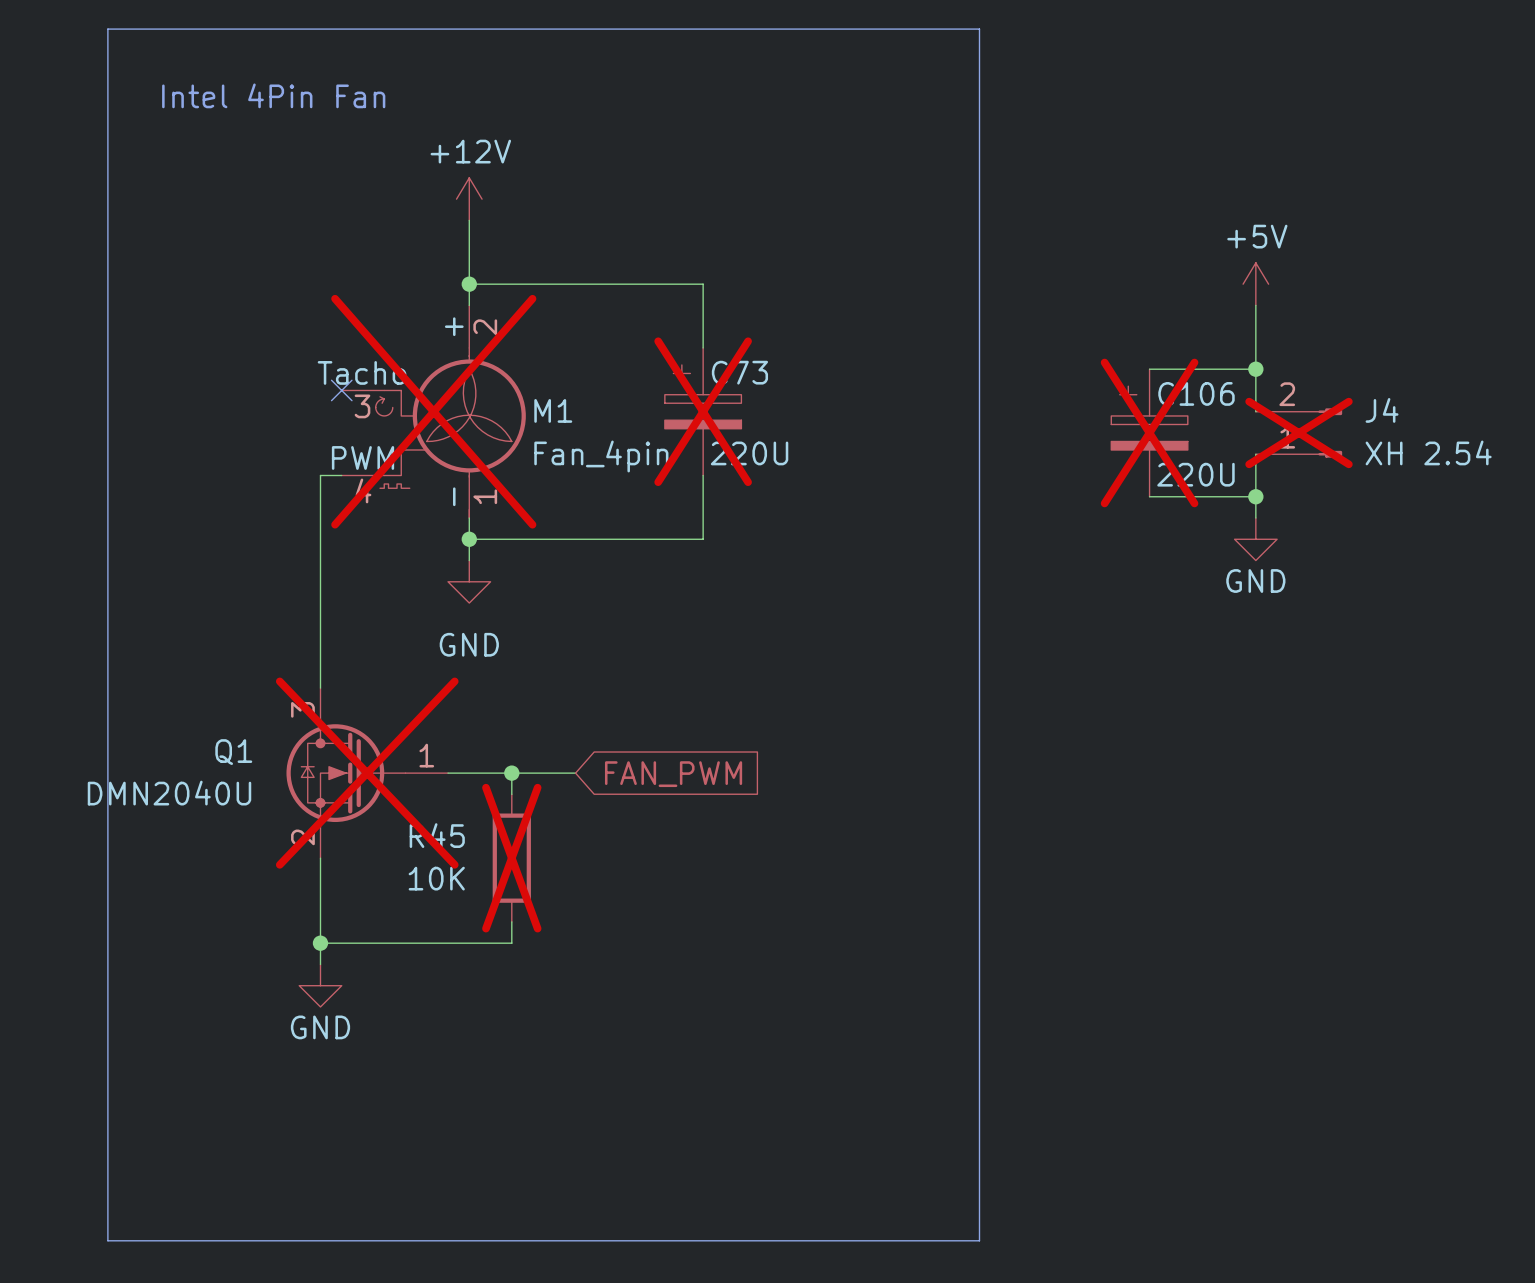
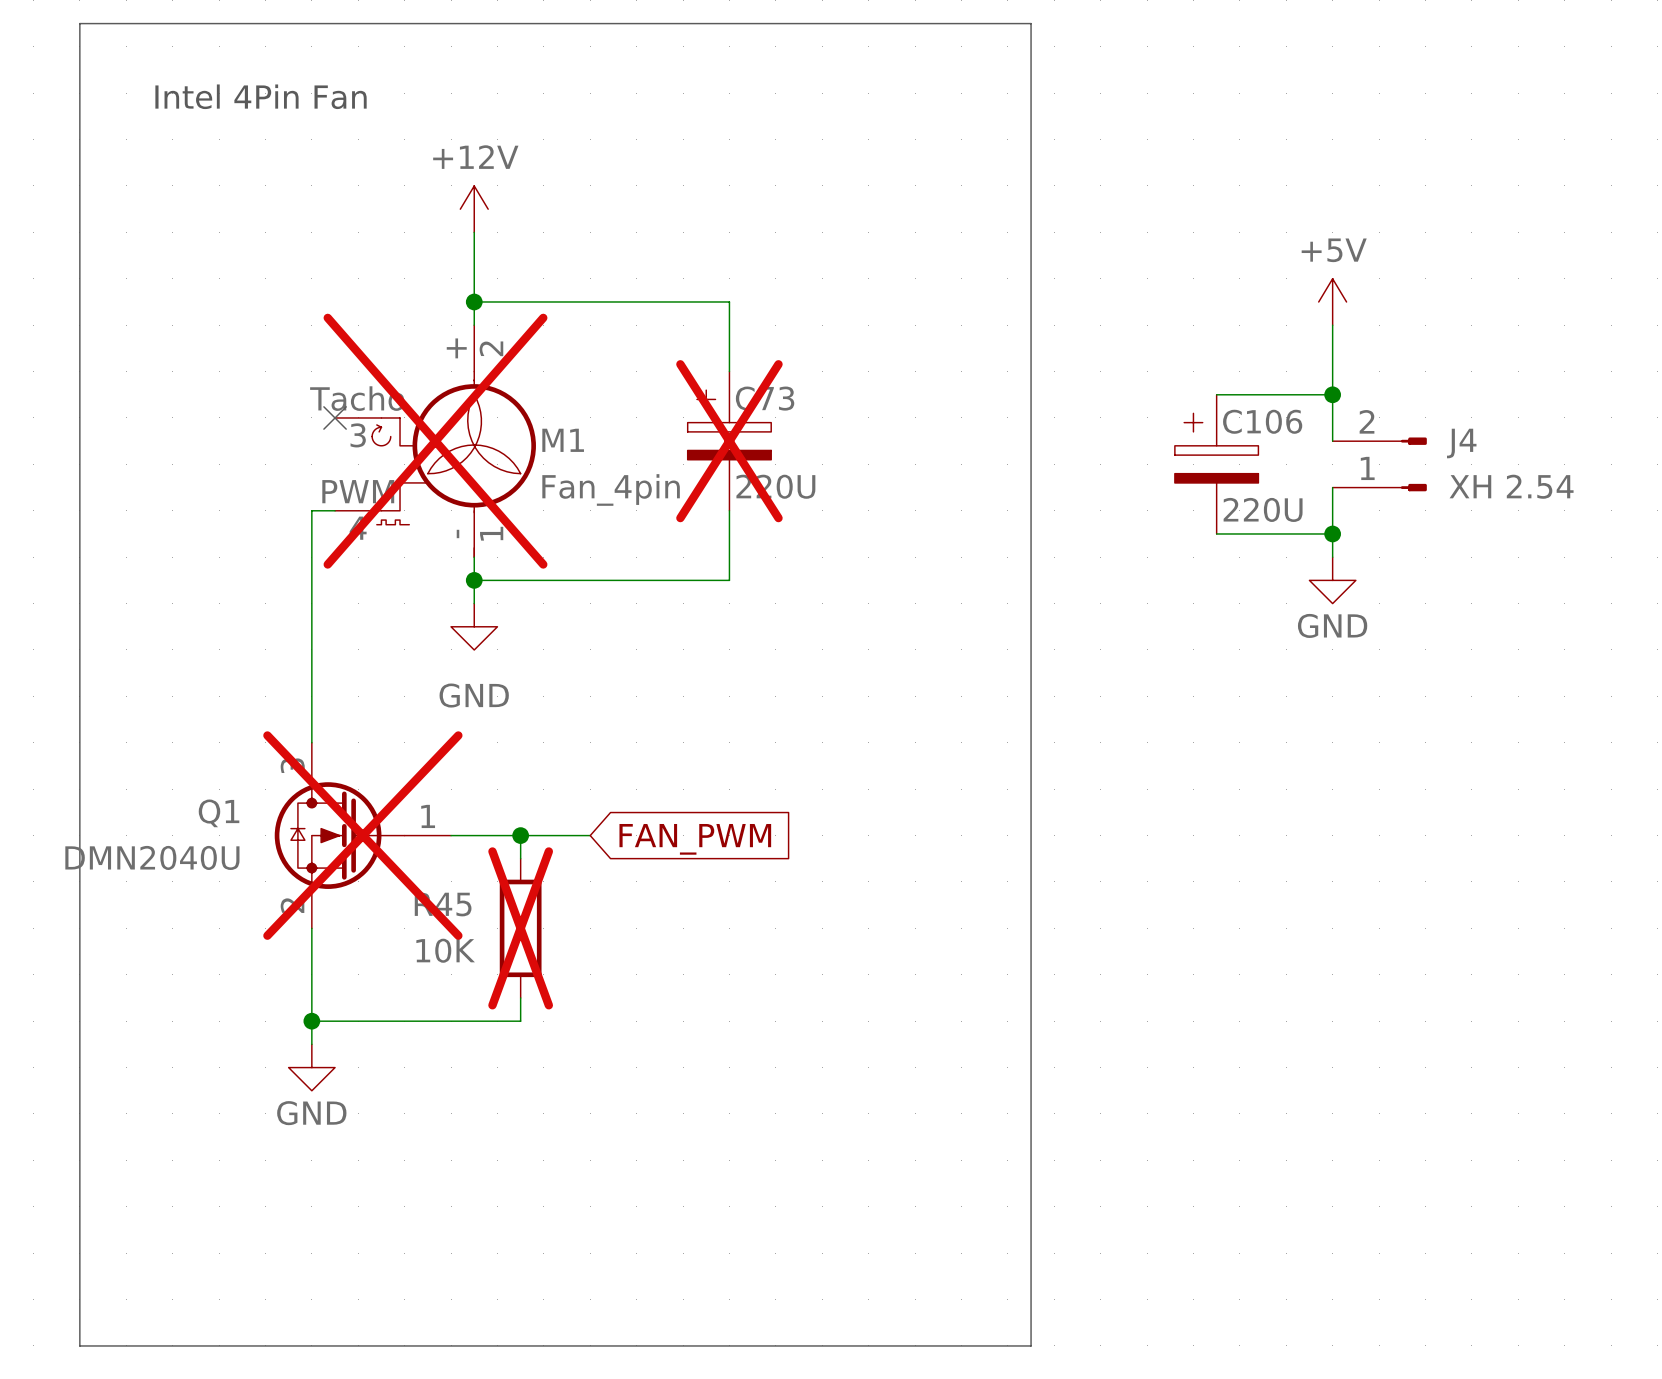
C106 do-not-place cross: (1149, 432) -> none
J4 do-not-place cross: (1299, 432) -> none

